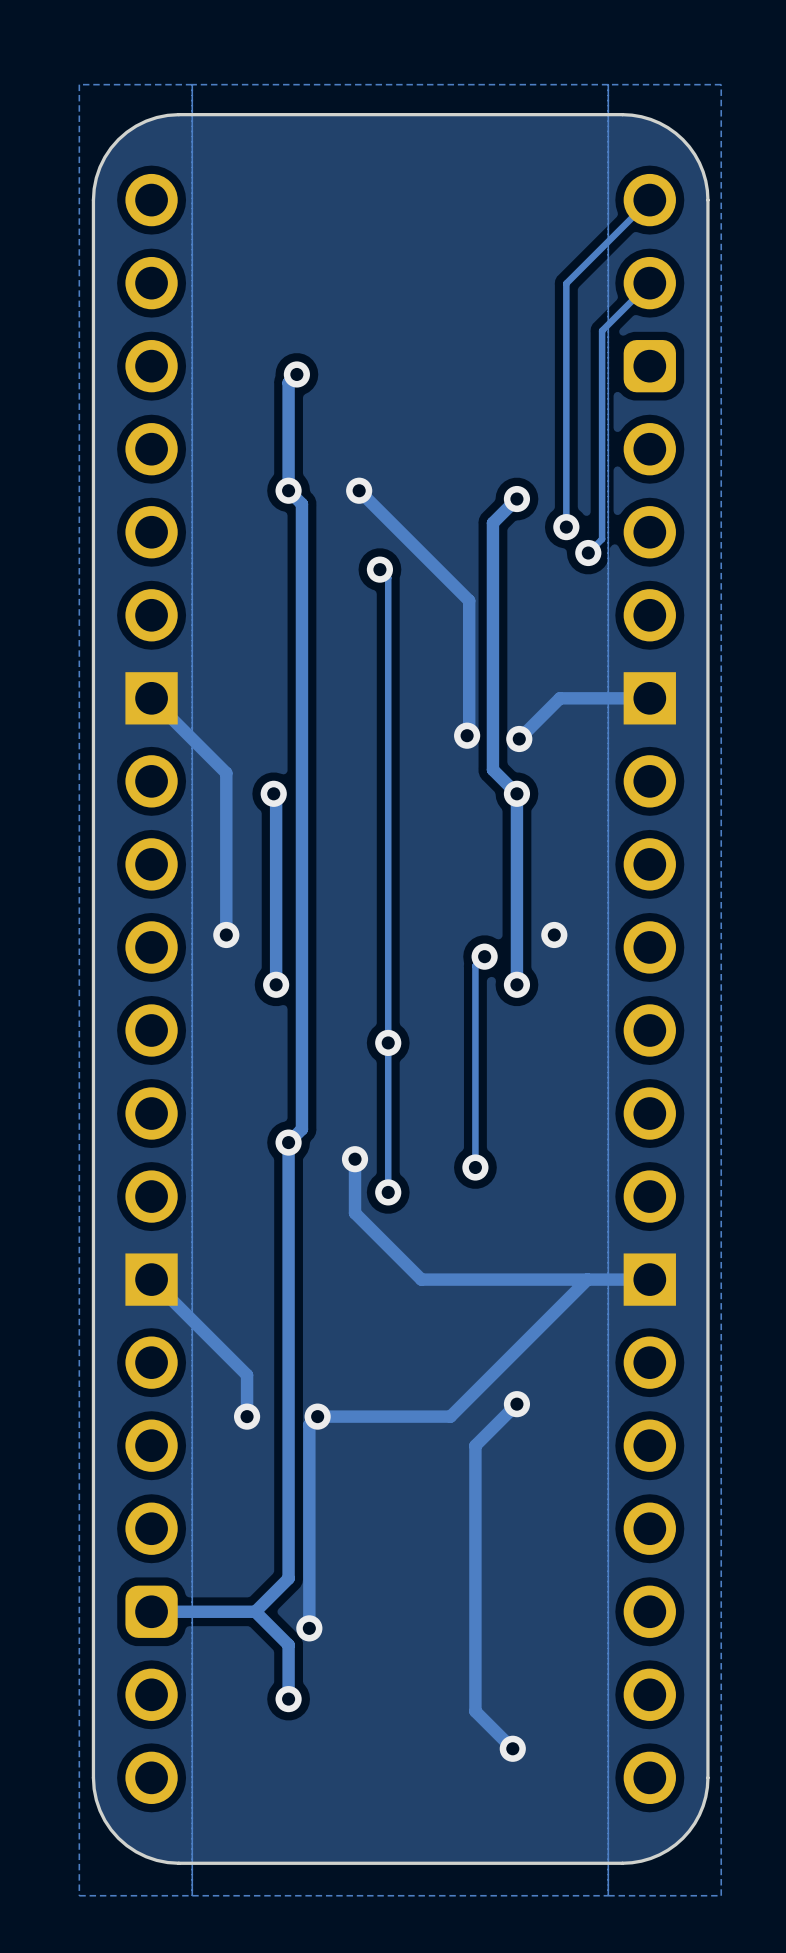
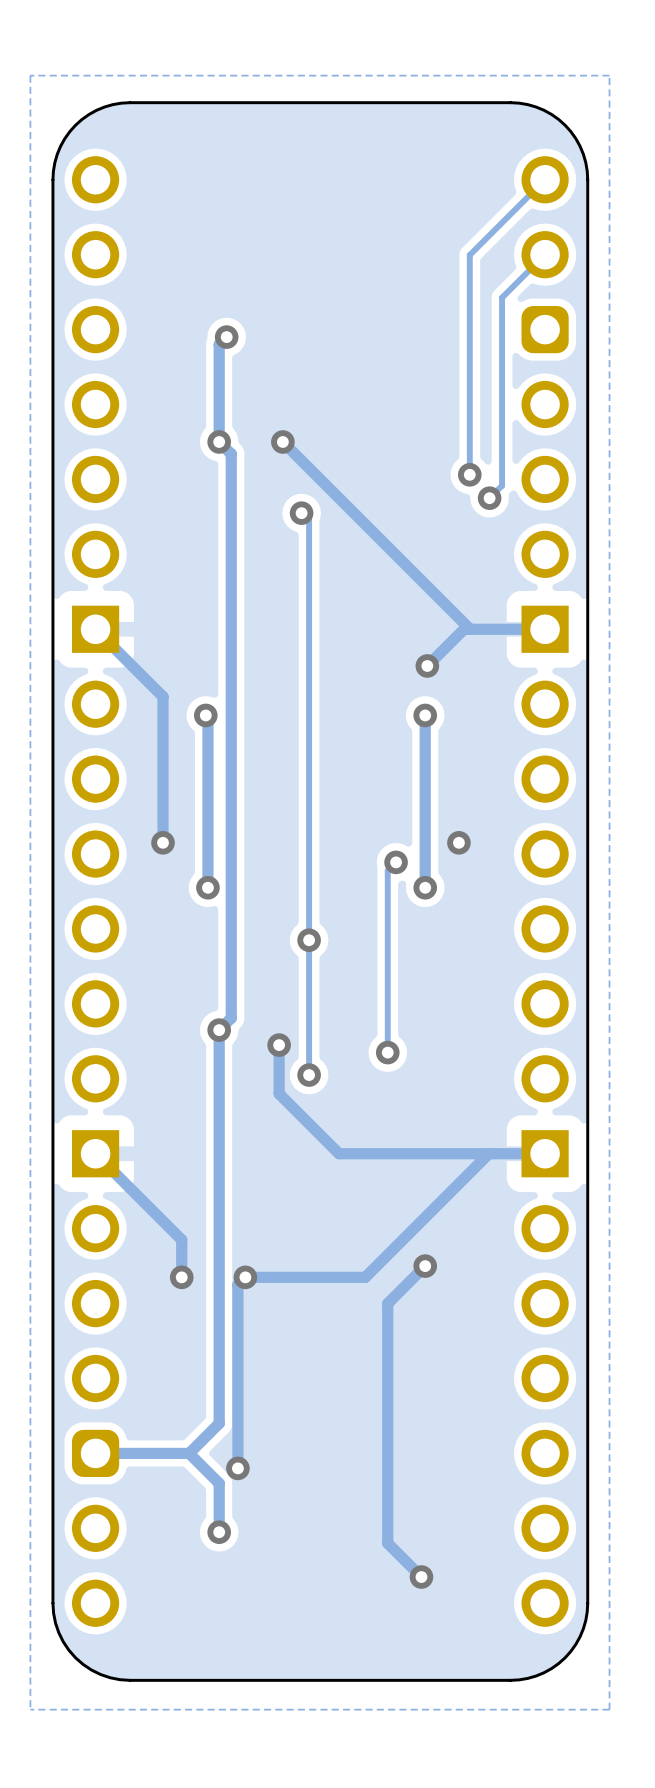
zone outline: (192, 84) (192, 1895) -> none
zone outline: (608, 84) (608, 1895) -> none
part footprint: [91, 113, 710, 1865] -> [51, 101, 590, 1682]
track: (516, 499) (492, 523) (492, 769) (516, 793) -> none
via: (516, 499) -> none
track: (469, 600) (469, 733) (467, 735) -> (382, 541) (470, 629)
via: (467, 735) -> none

